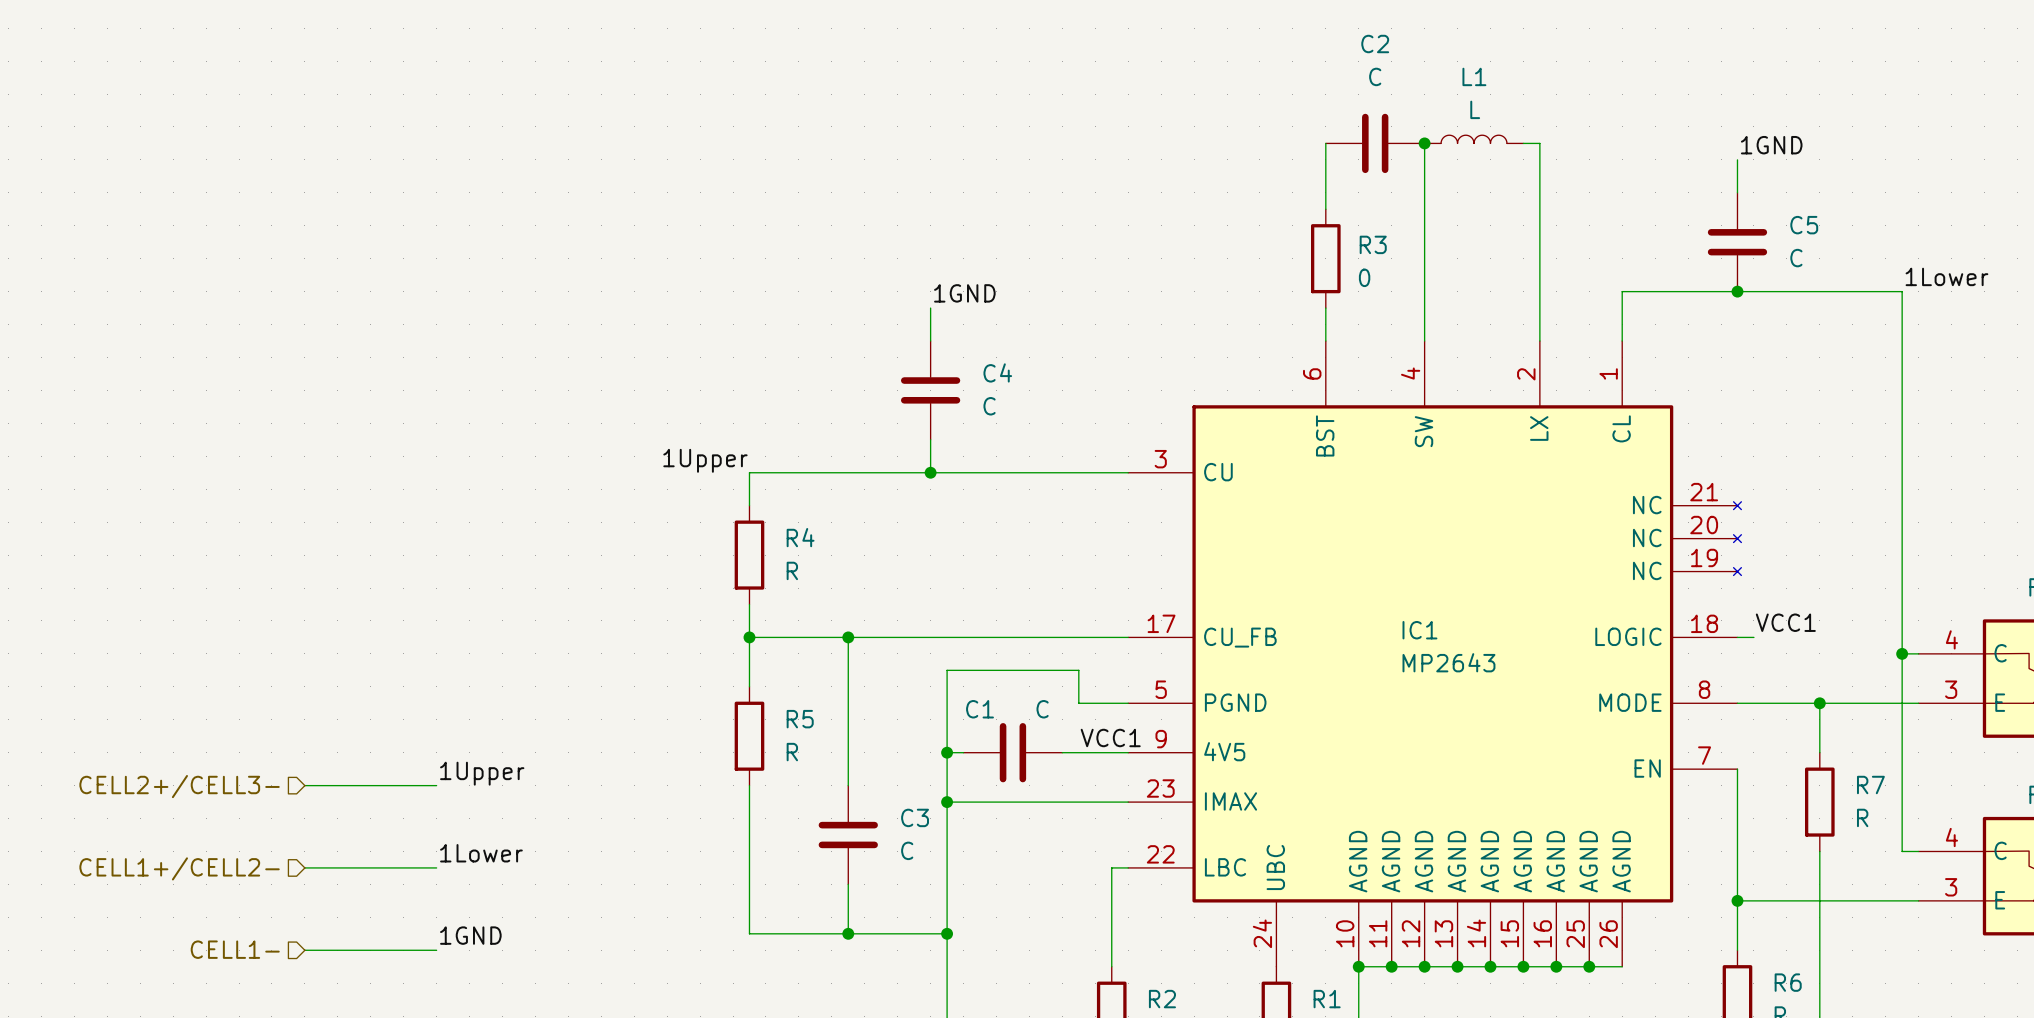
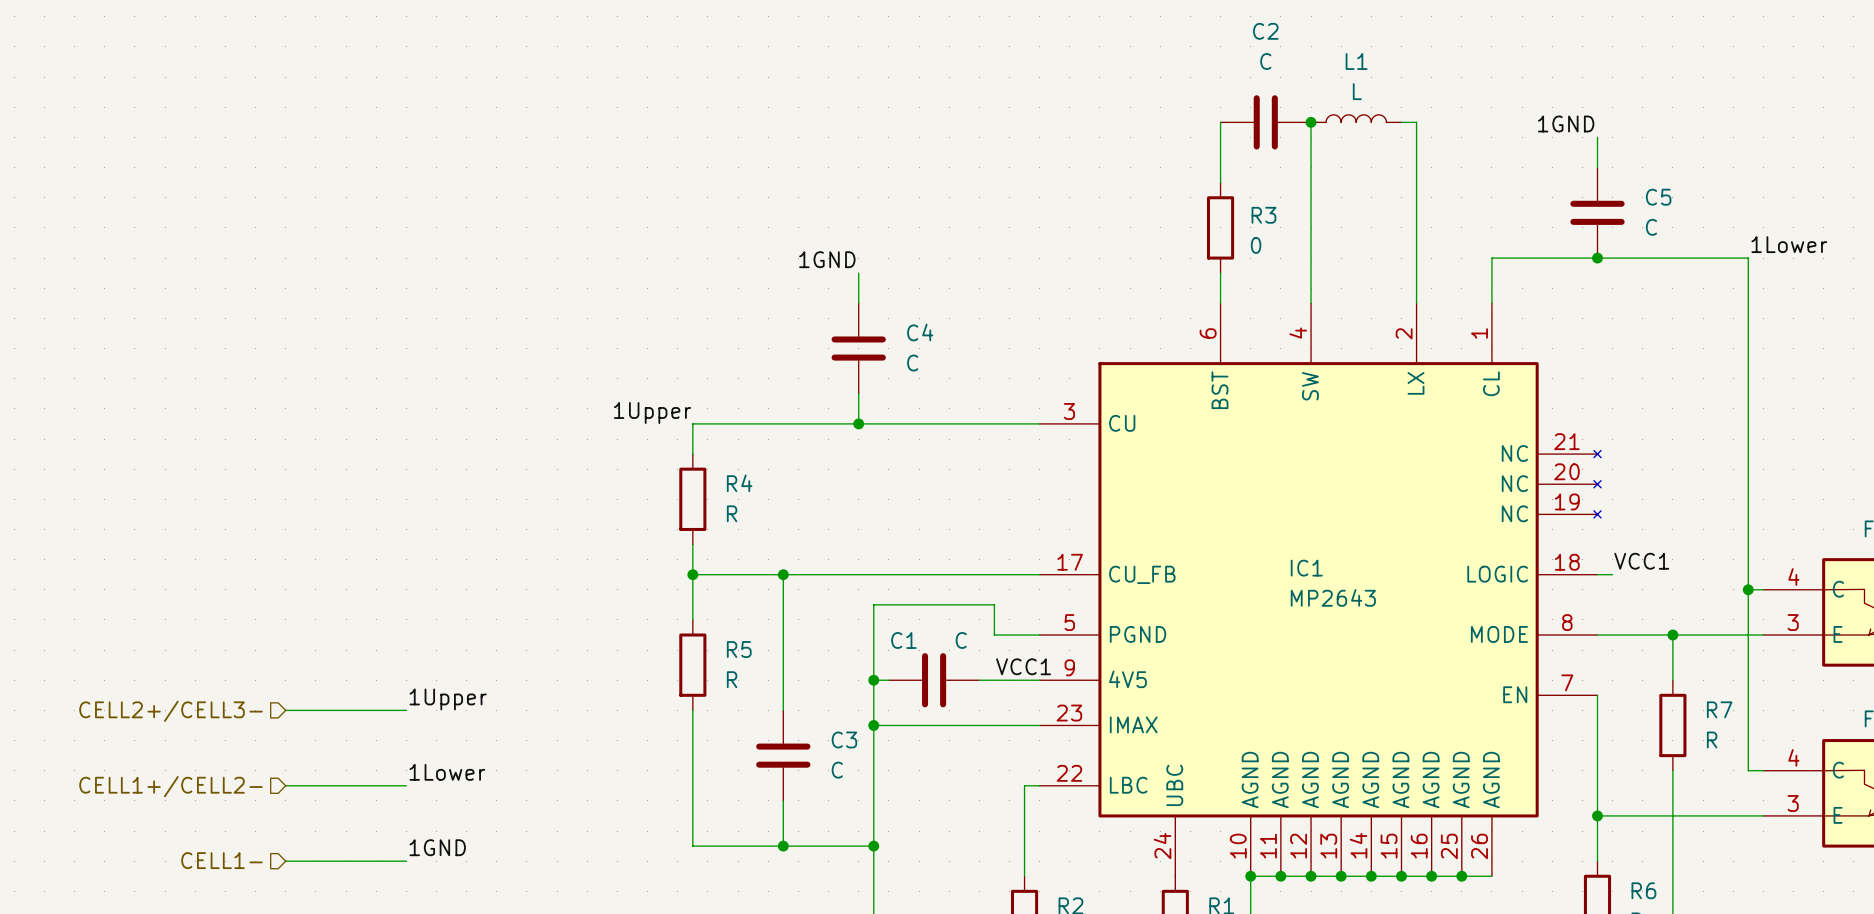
label position: 1GND (1771, 145) -> 1GND (1566, 123)
label position: 1GND (964, 293) -> 1GND (827, 259)

